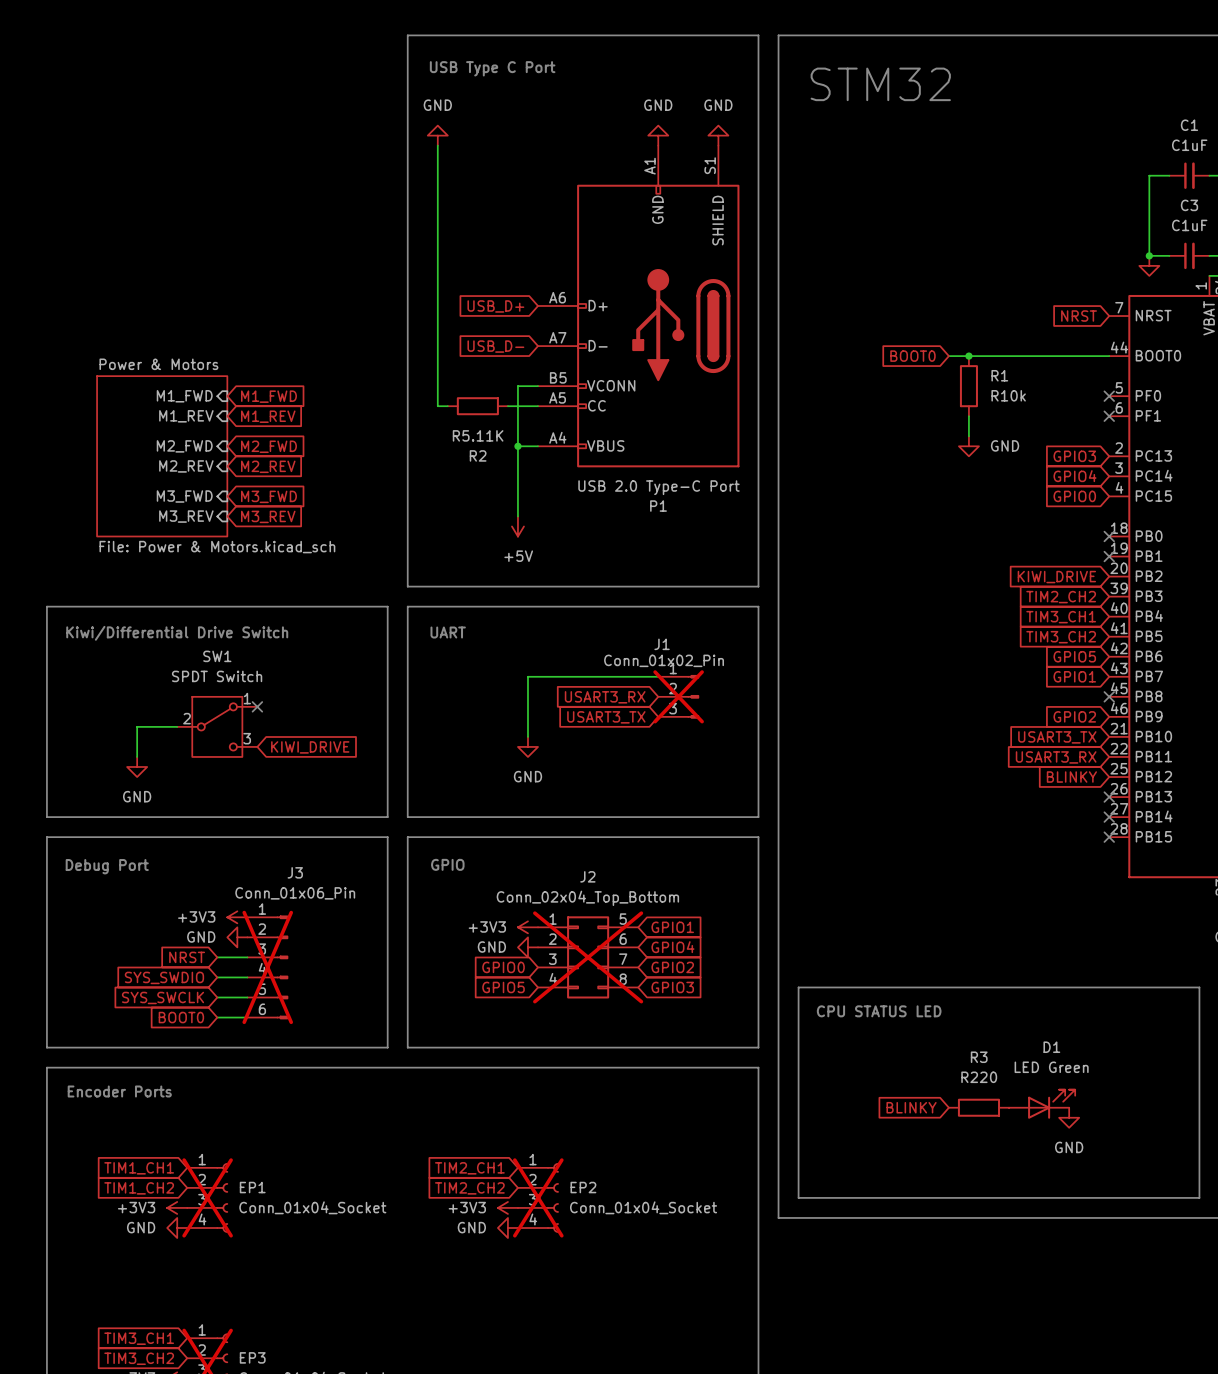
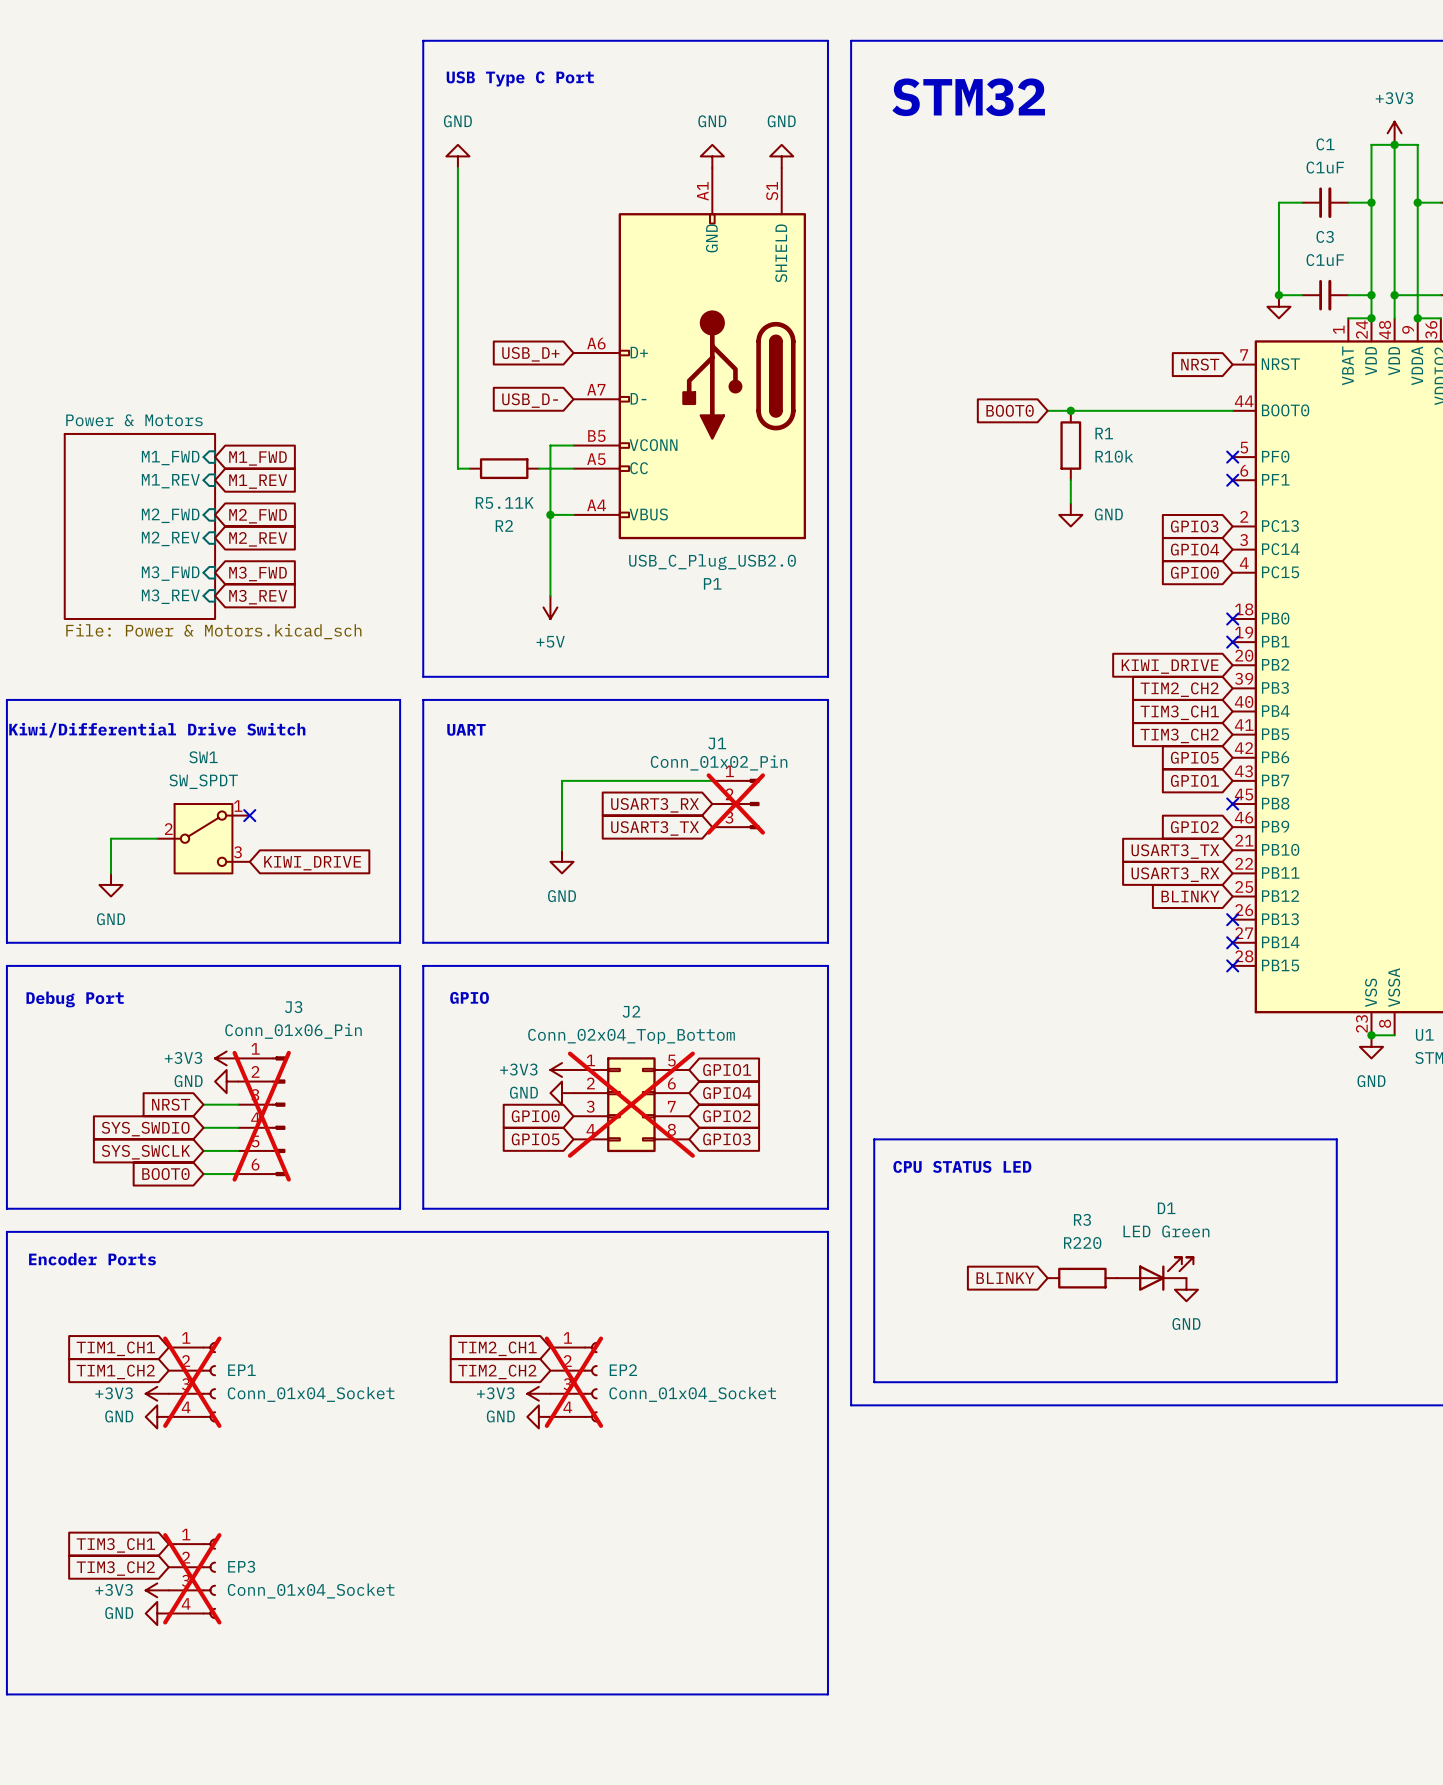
P1 value: USB 2.0 Type-C Port (658, 487) -> USB_C_Plug_USB2.0 (712, 562)
SW1 value: SPDT Switch (217, 676) -> SW_SPDT (203, 781)

